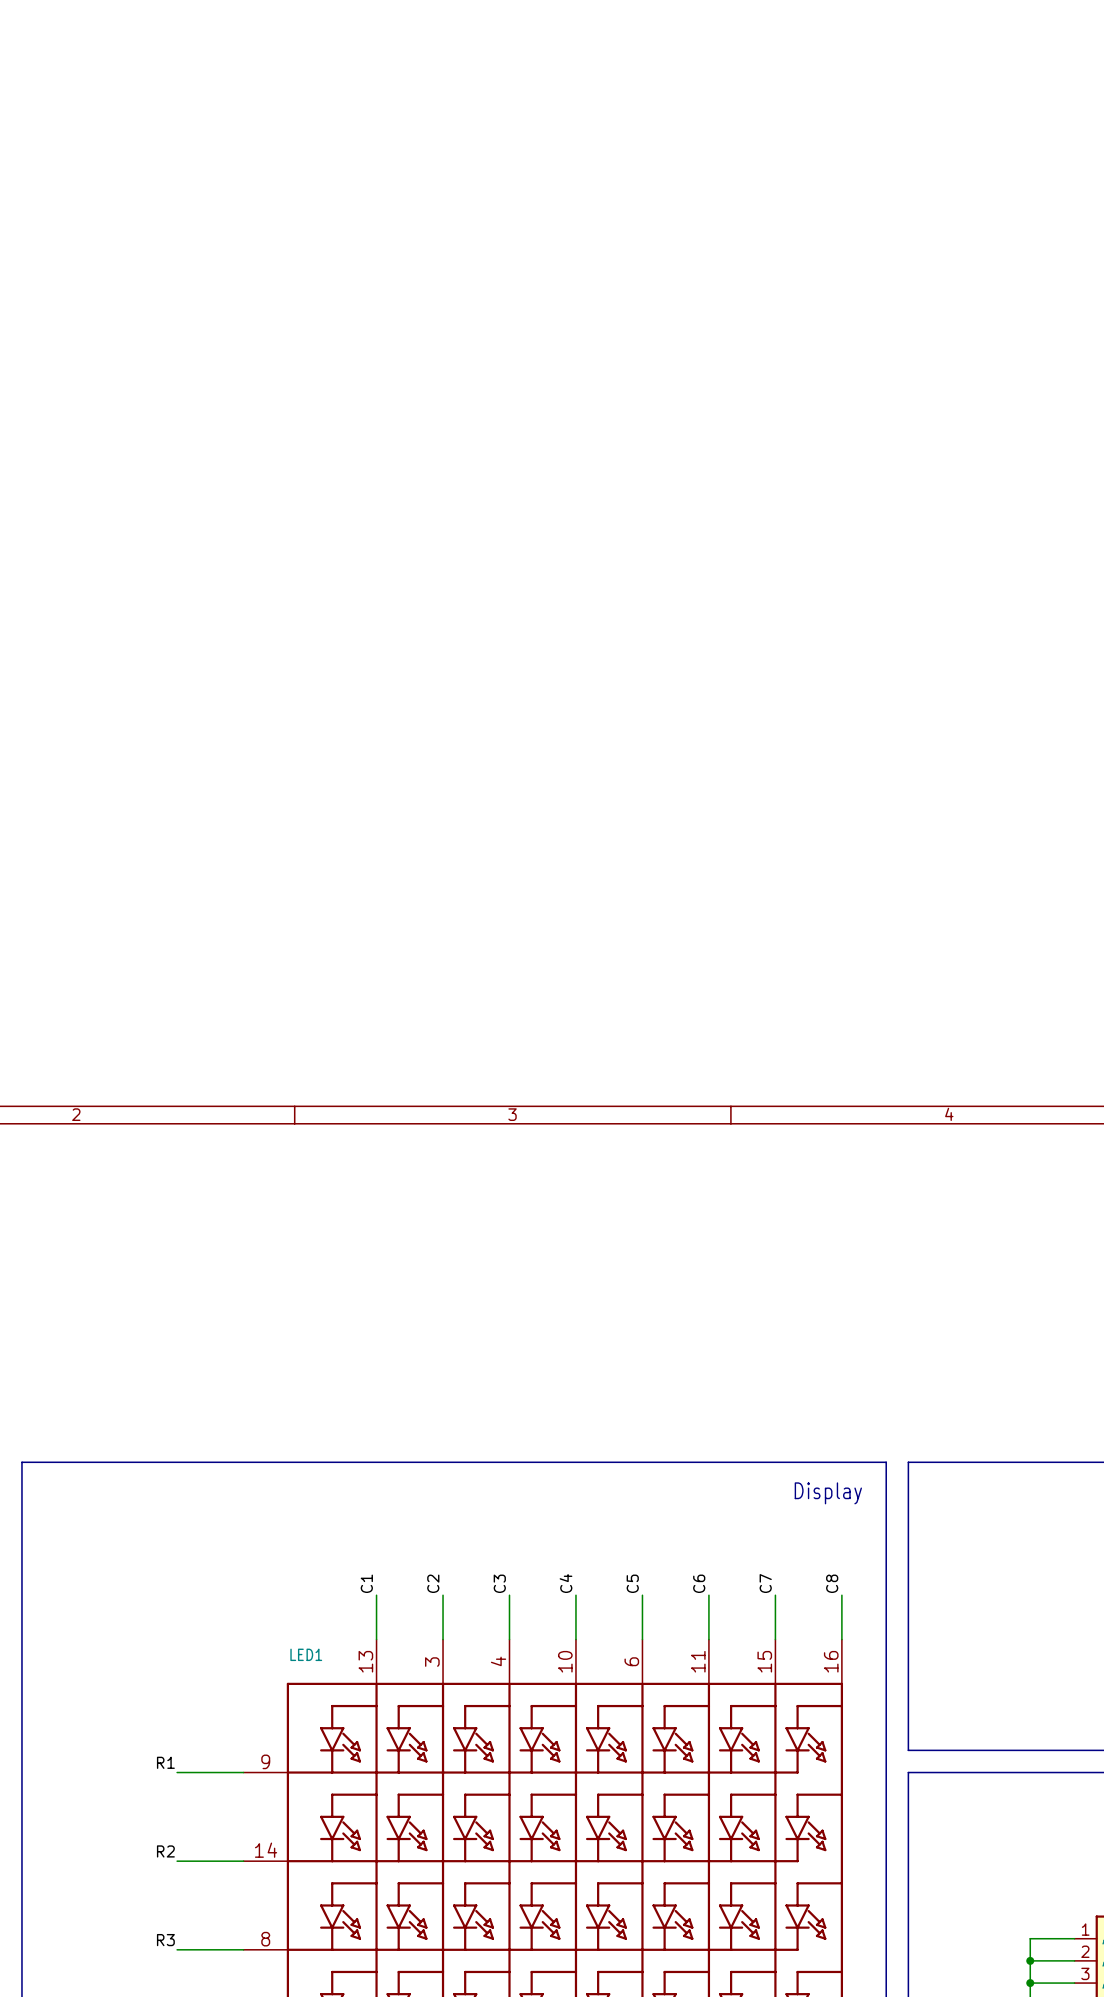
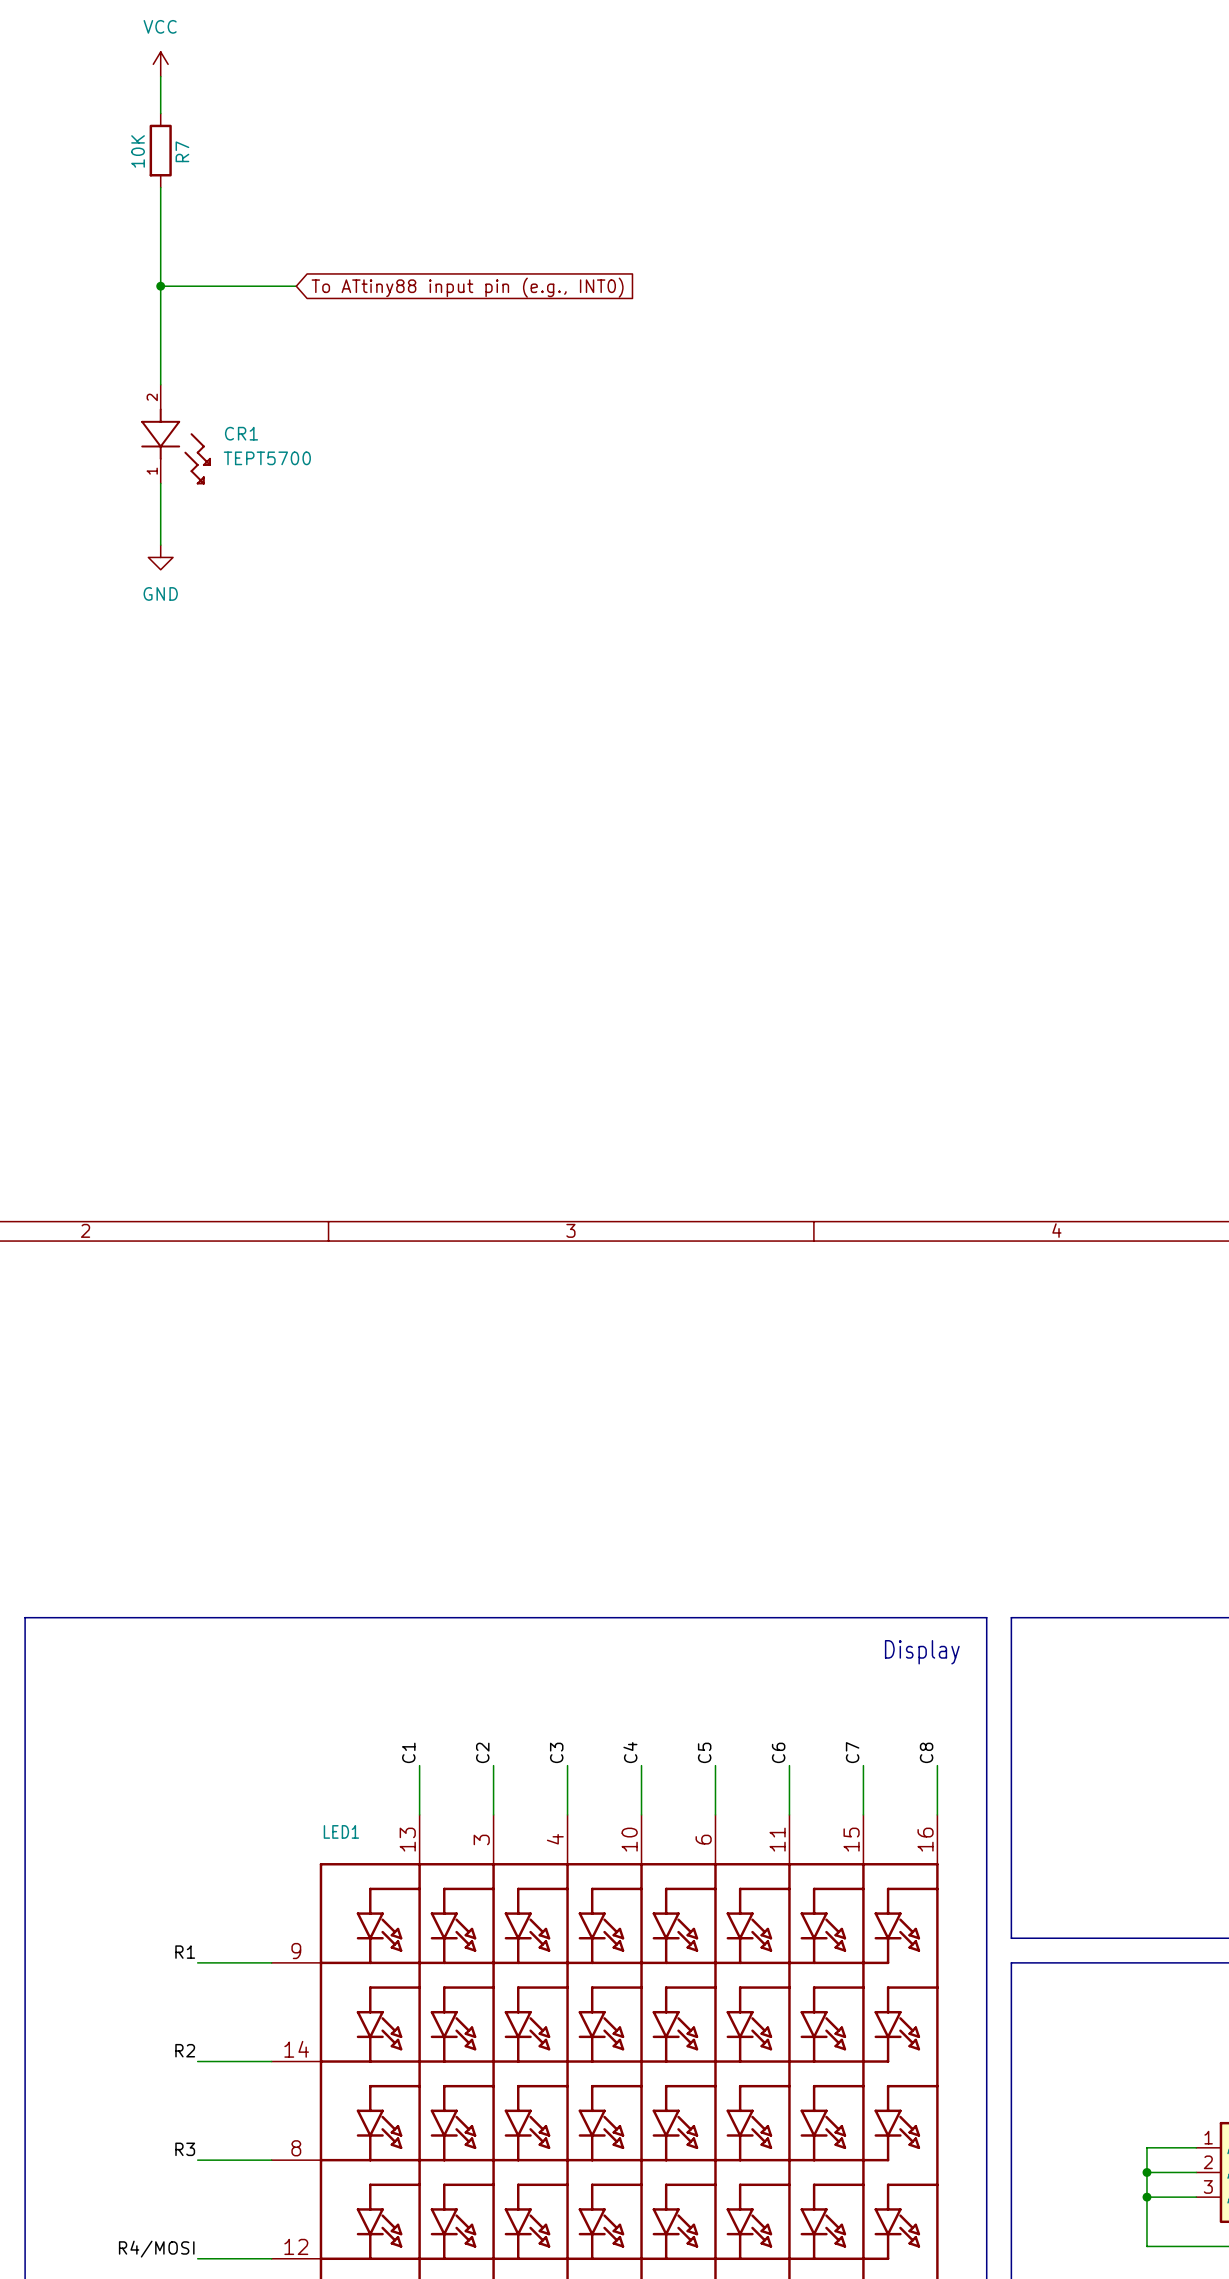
power symbol: none -> VCC (160, 64)
wire: none -> (160, 76) (160, 113)
R7: none -> 10K (160, 150)
wire: none -> (160, 187) (160, 384)
wire: none -> (160, 286) (296, 286)
junction: none -> (160, 286)
global label: none -> To ATtiny88 input pin (e.g., INT0) (467, 287)
CR1: none -> TEPT5700 (176, 434)
wire: none -> (160, 483) (160, 545)
power symbol: none -> GND (160, 557)

